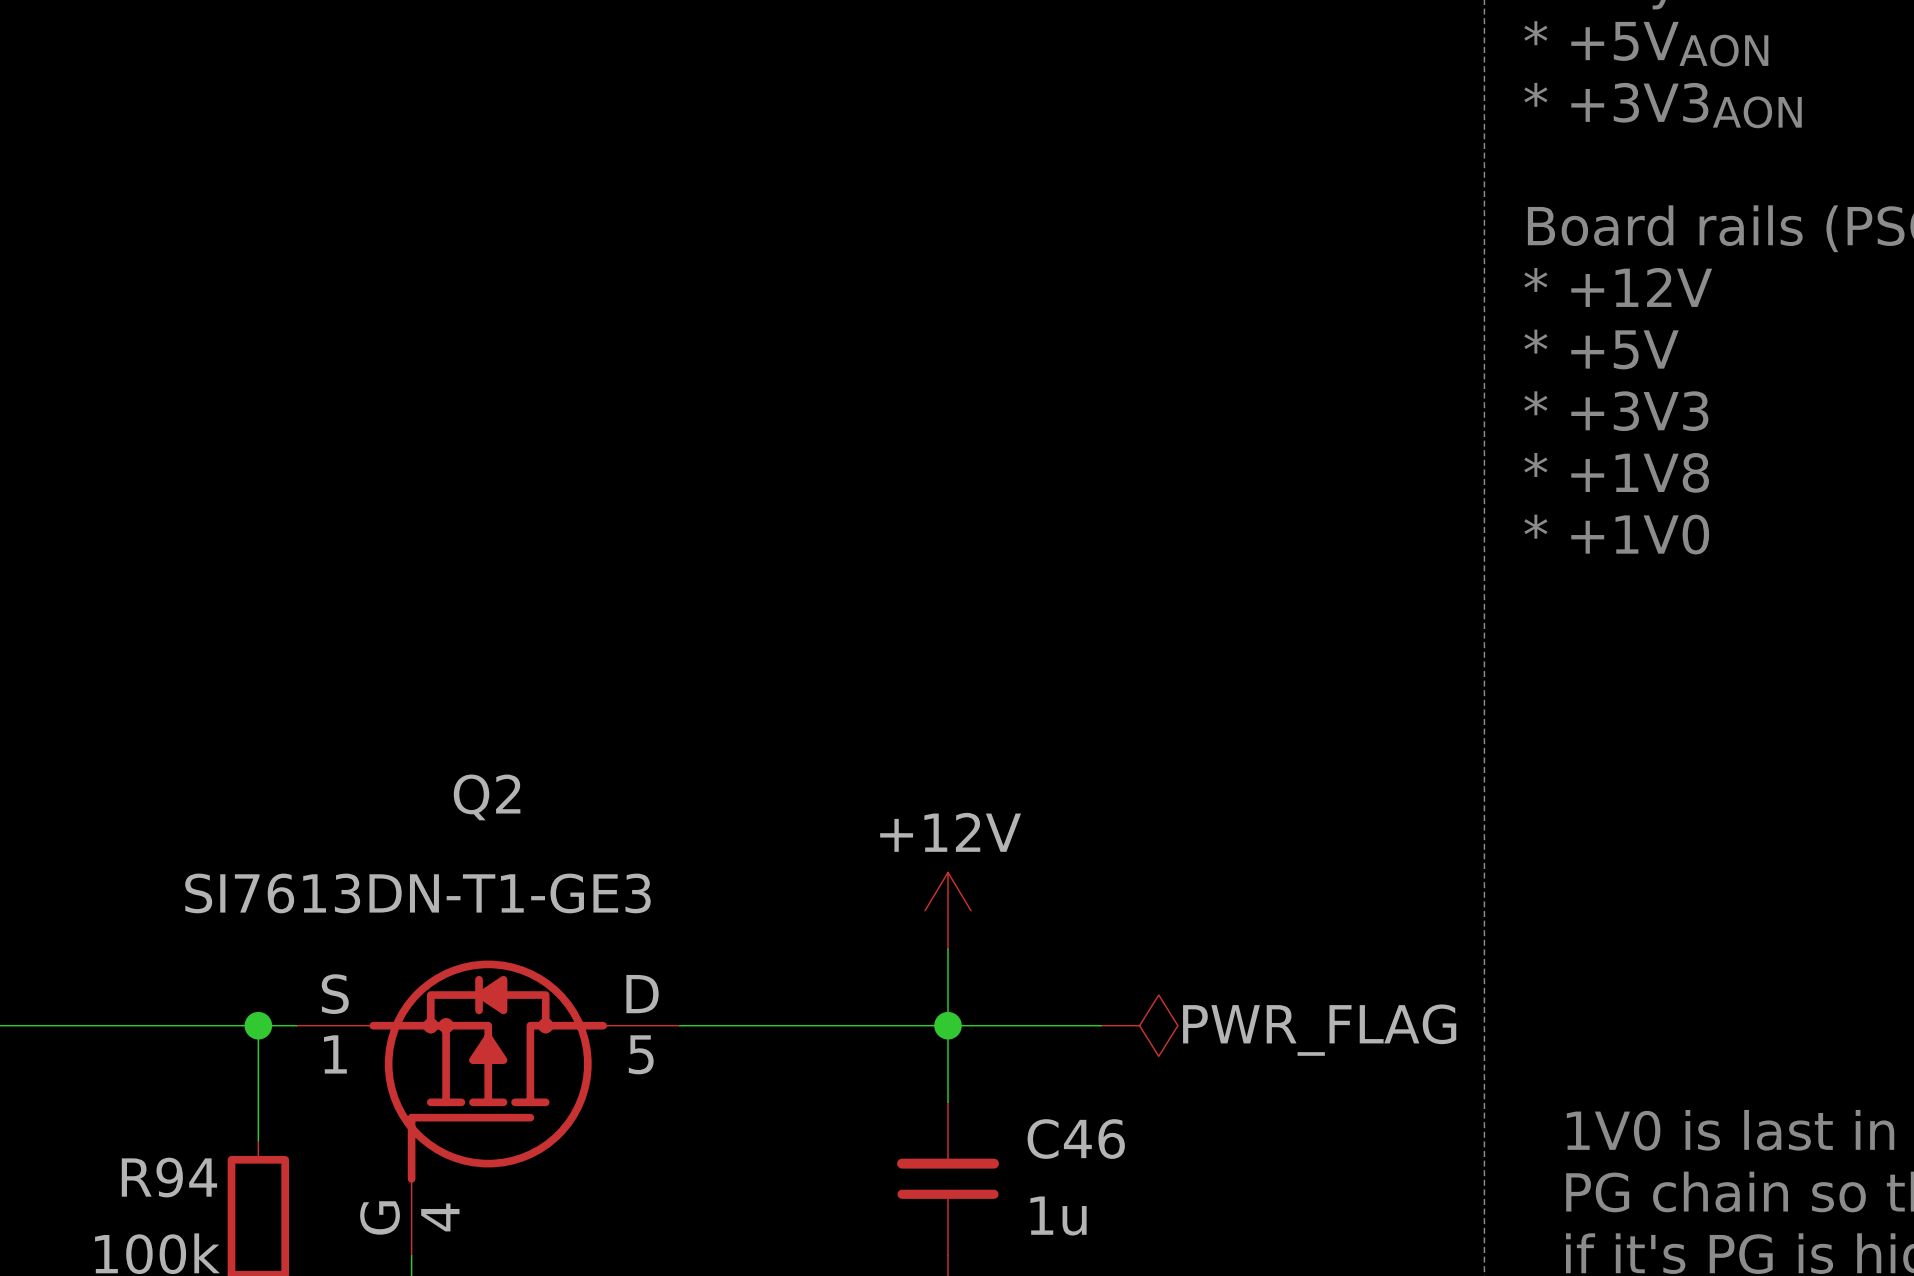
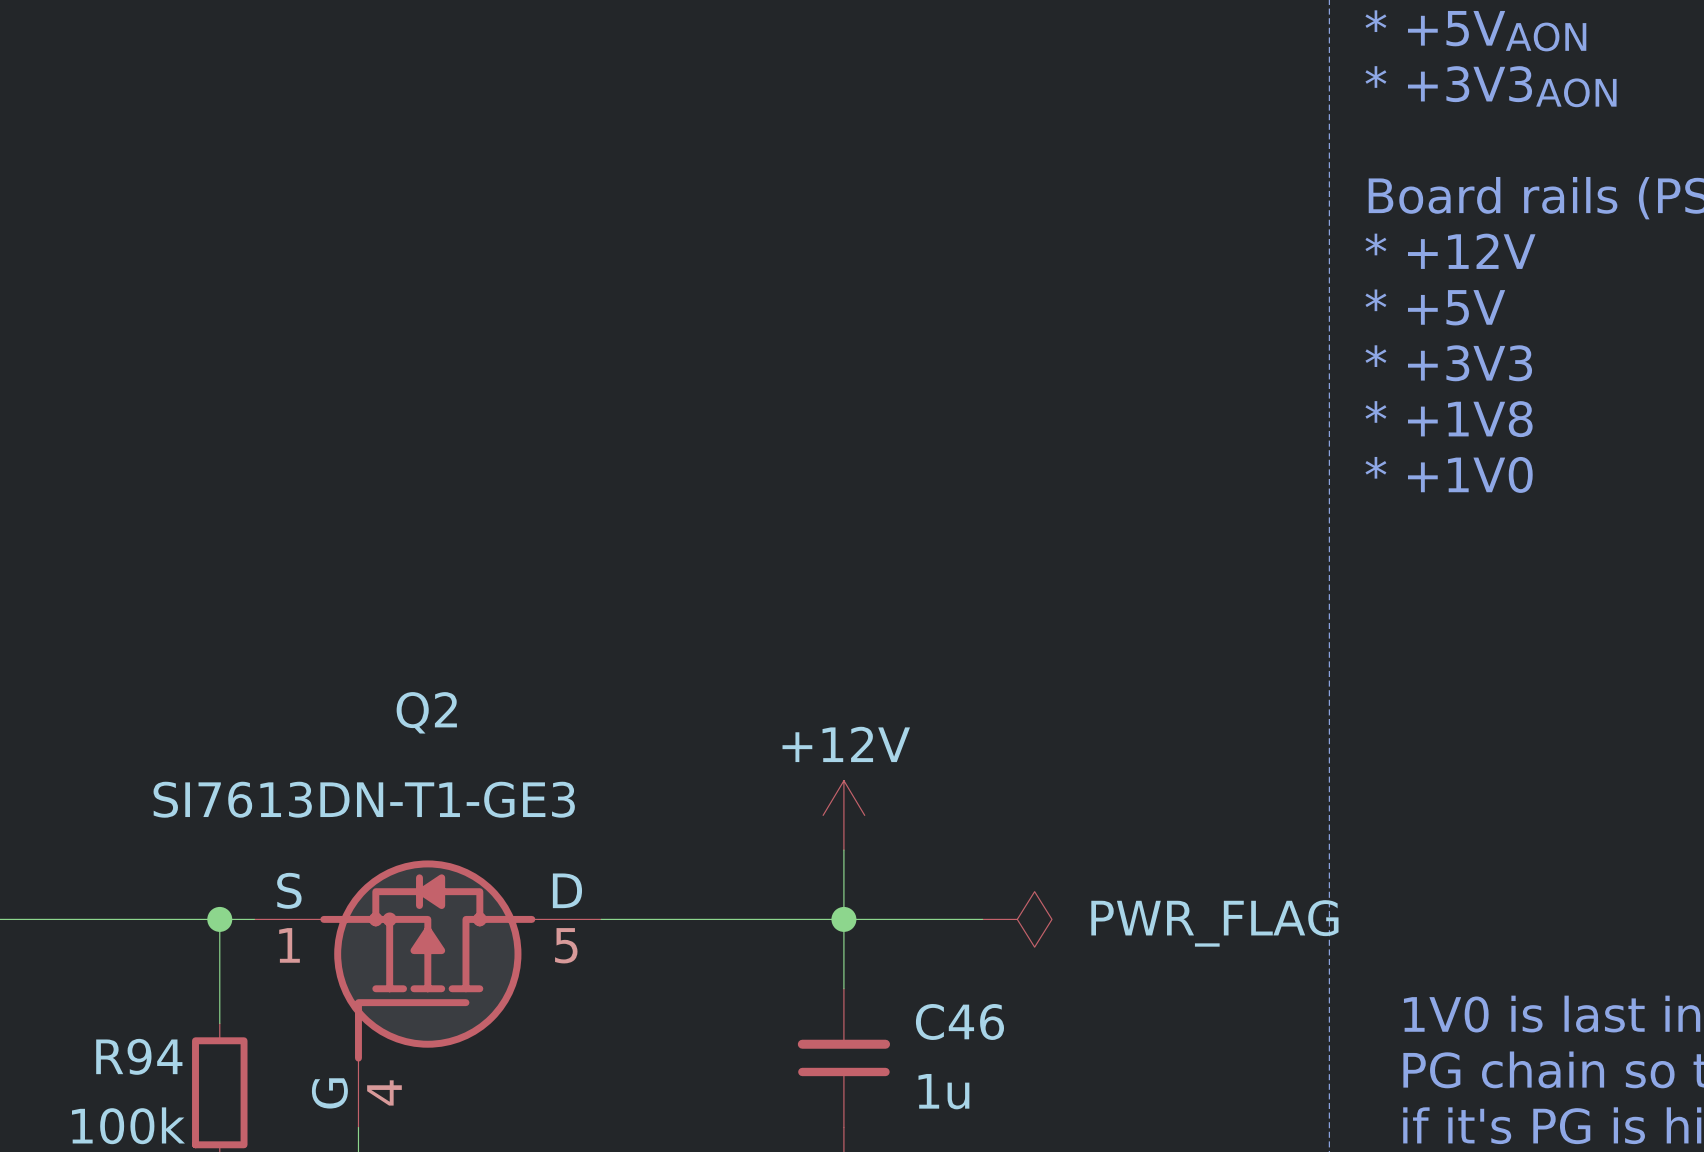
power symbol text position: PWR_FLAG (1319, 1030) -> PWR_FLAG (1214, 923)

